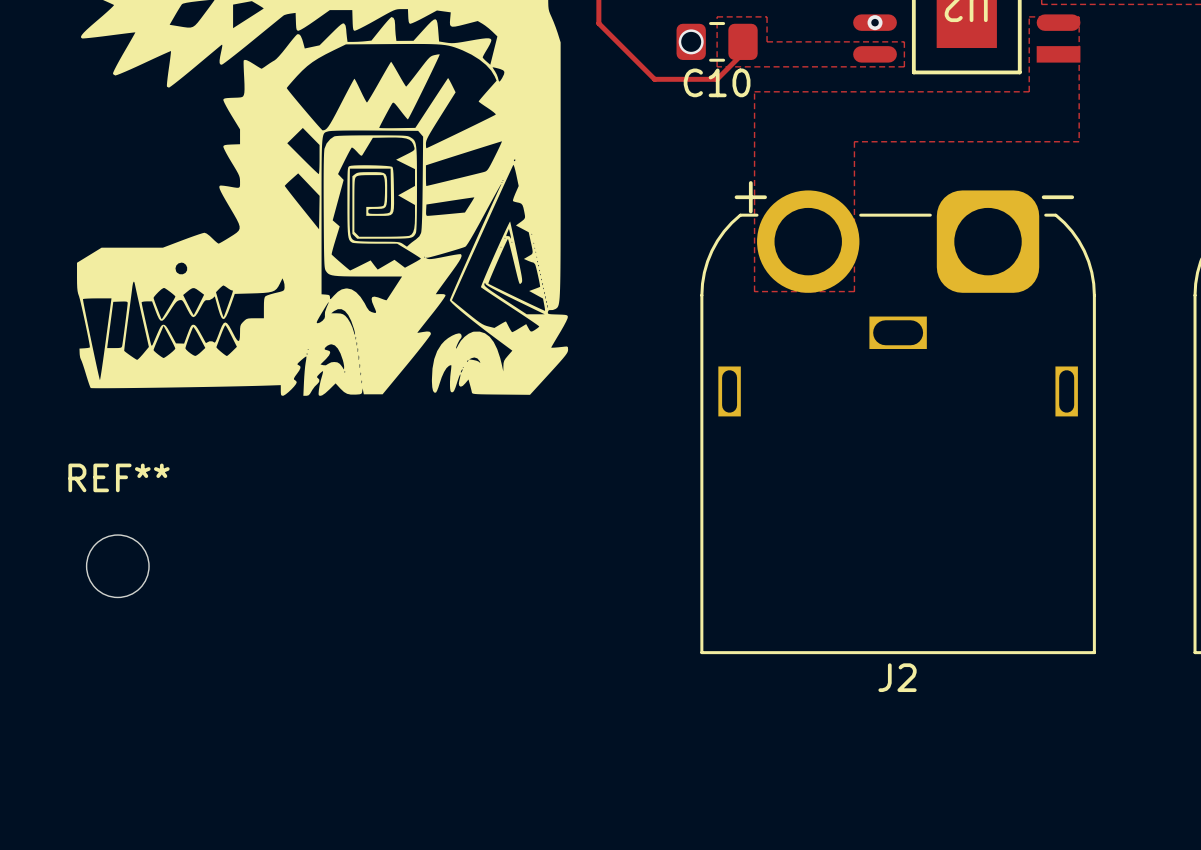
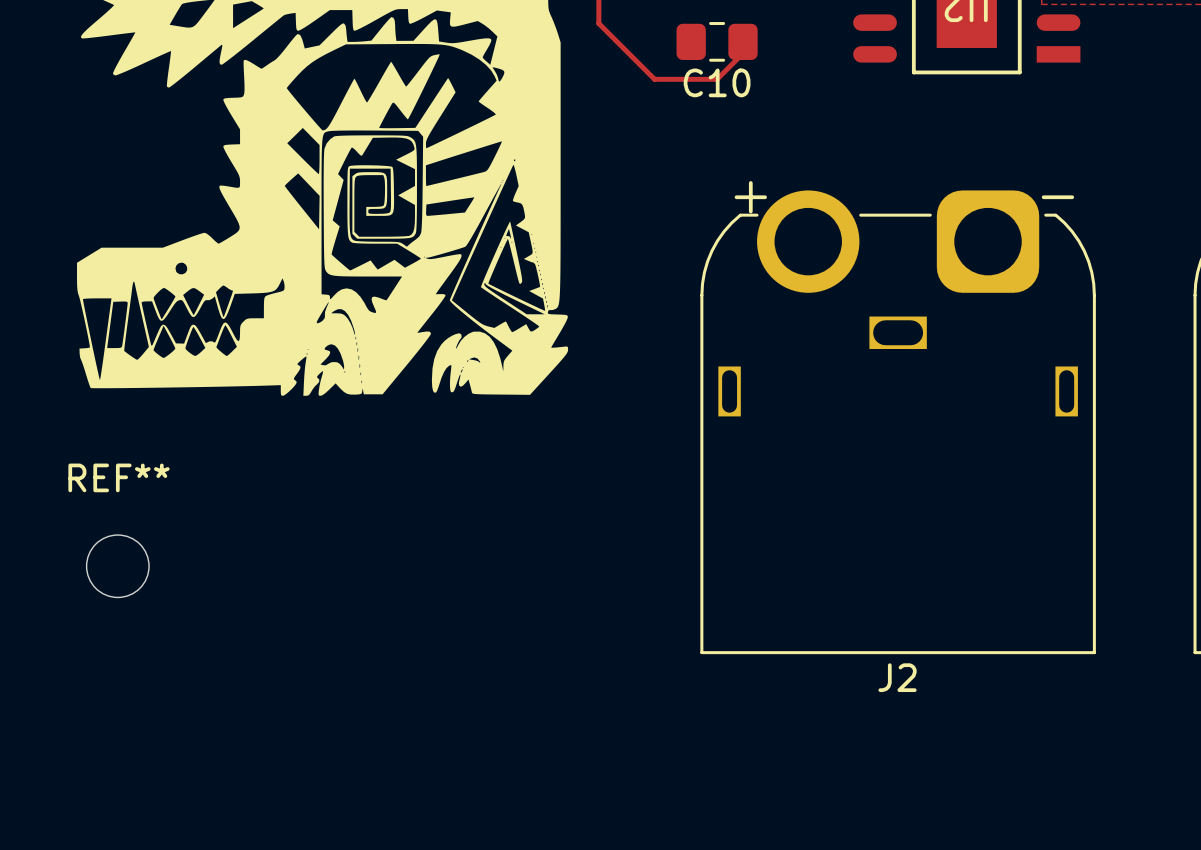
zone outline: (717, 16) (717, 66) (904, 66) (904, 41) (767, 41) (767, 16) (717, 16) -> none
zone outline: (1029, 16) (1079, 16) (1079, 141) (854, 141) (854, 291) (754, 291) (754, 91) (1029, 91) (1029, 16) -> none
via: (875, 22) -> none
via: (691, 41) -> none

